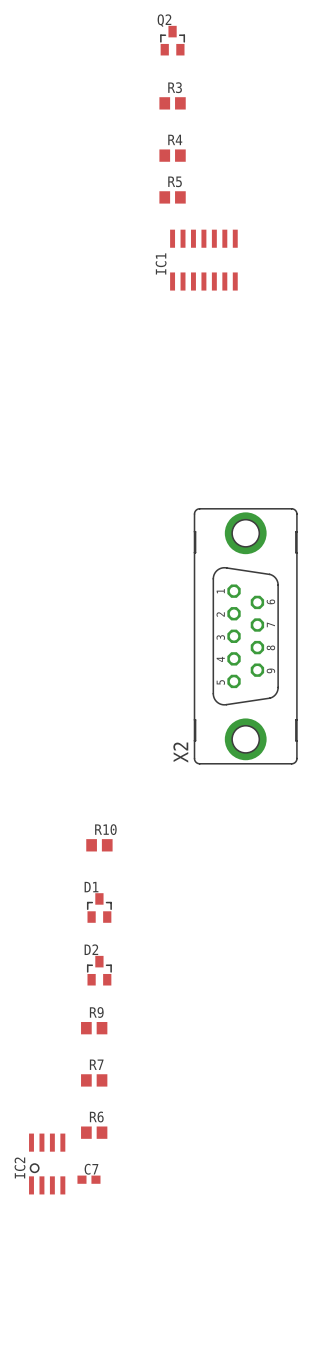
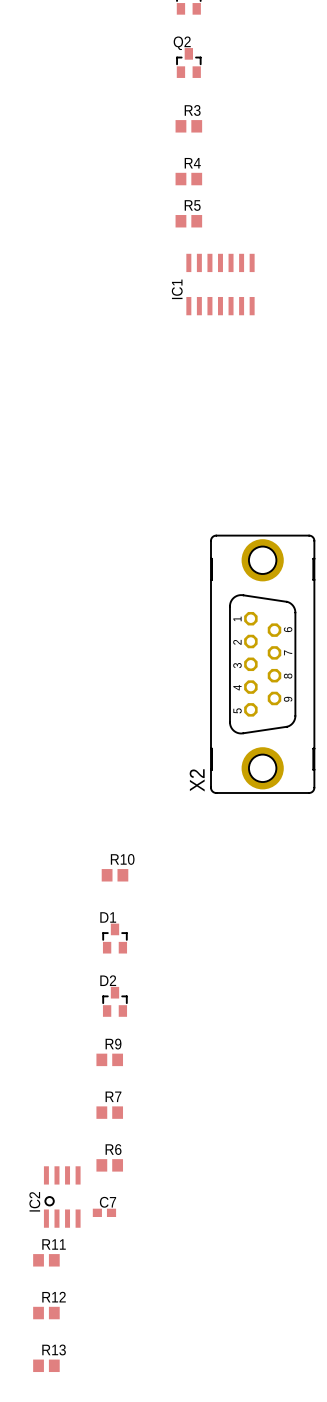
R11: none -> (46, 1260)
R12: none -> (46, 1313)
R13: none -> (46, 1365)

